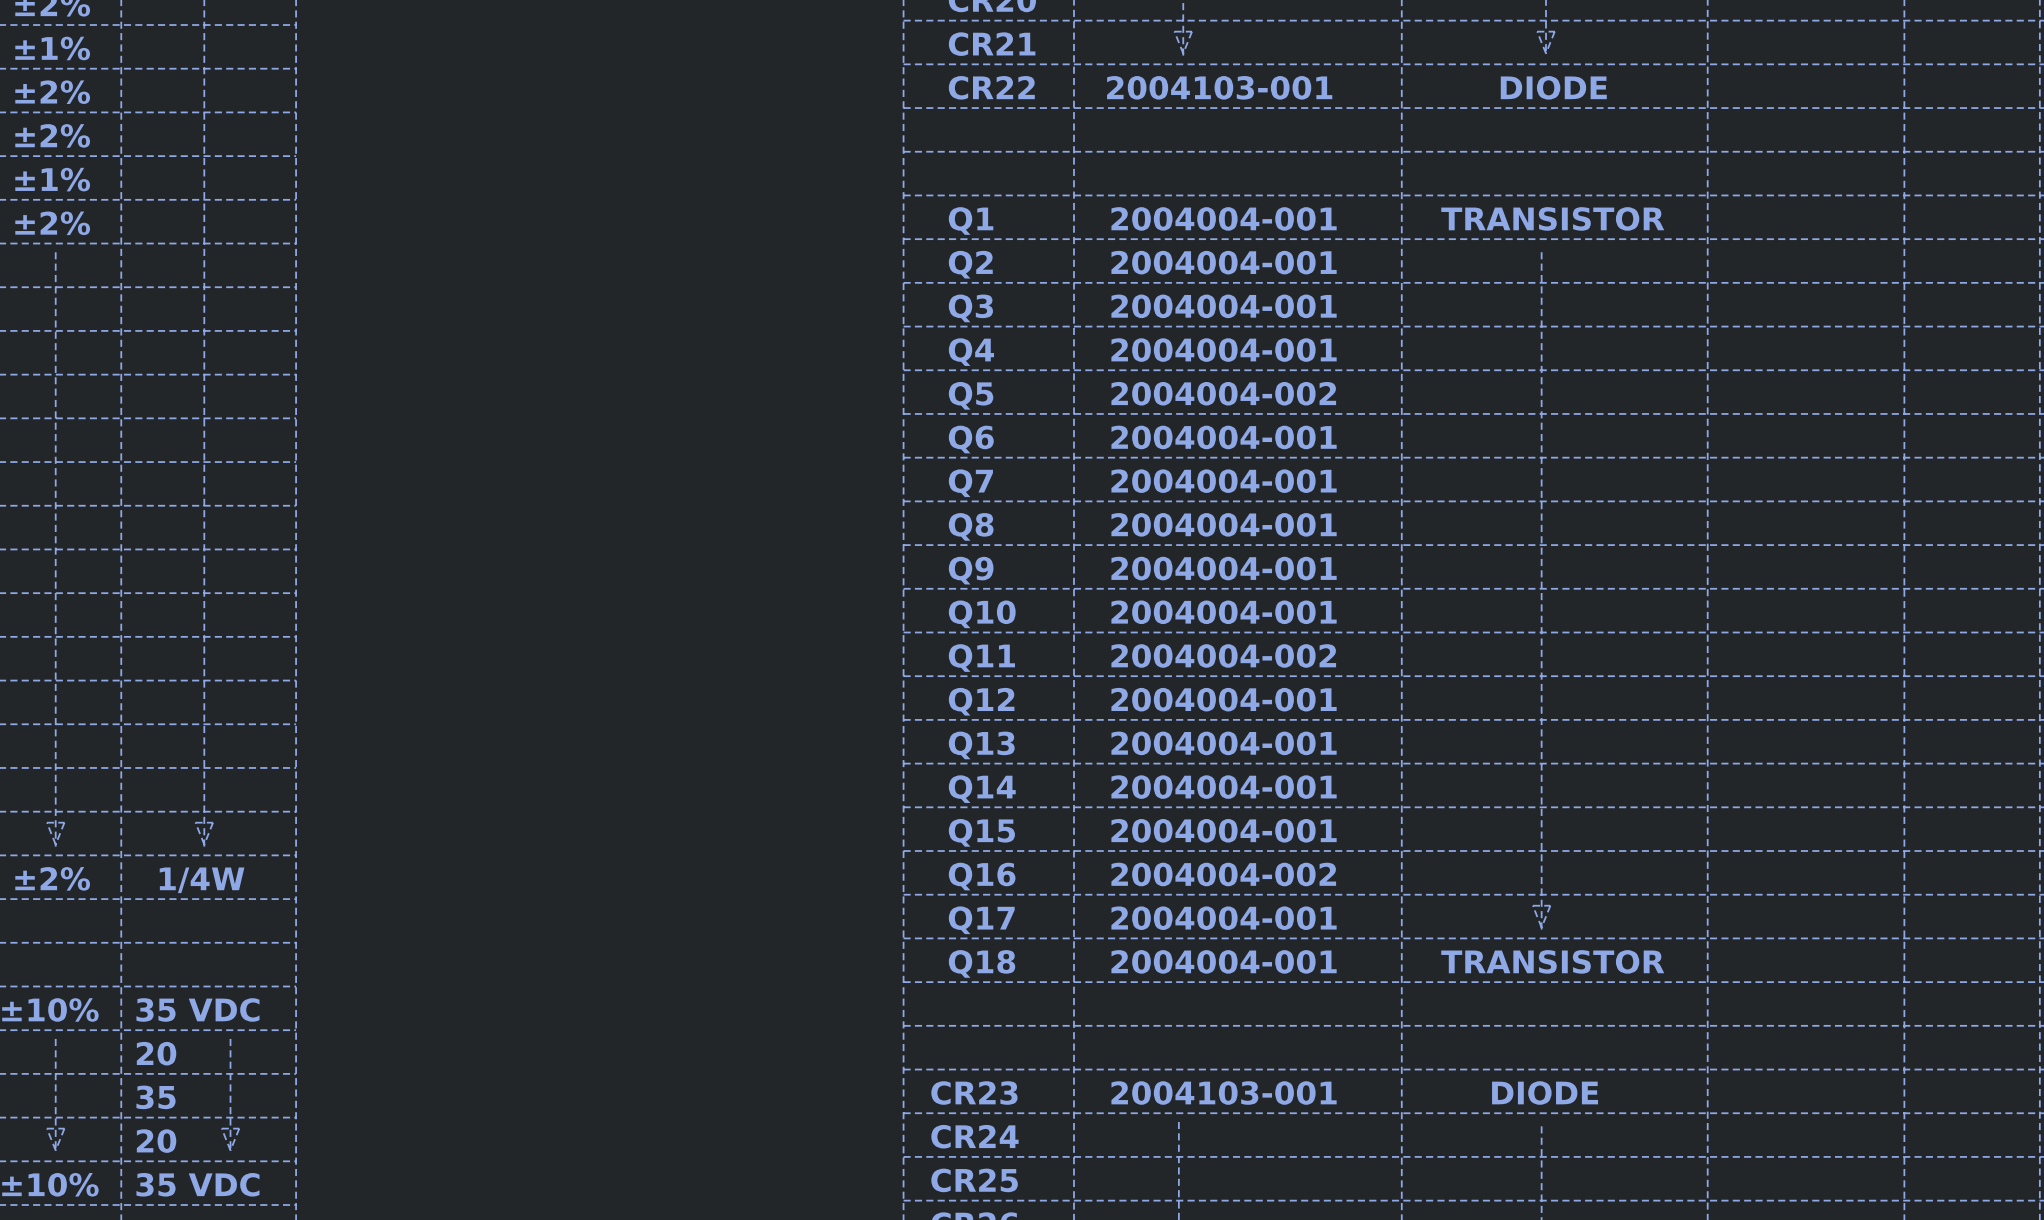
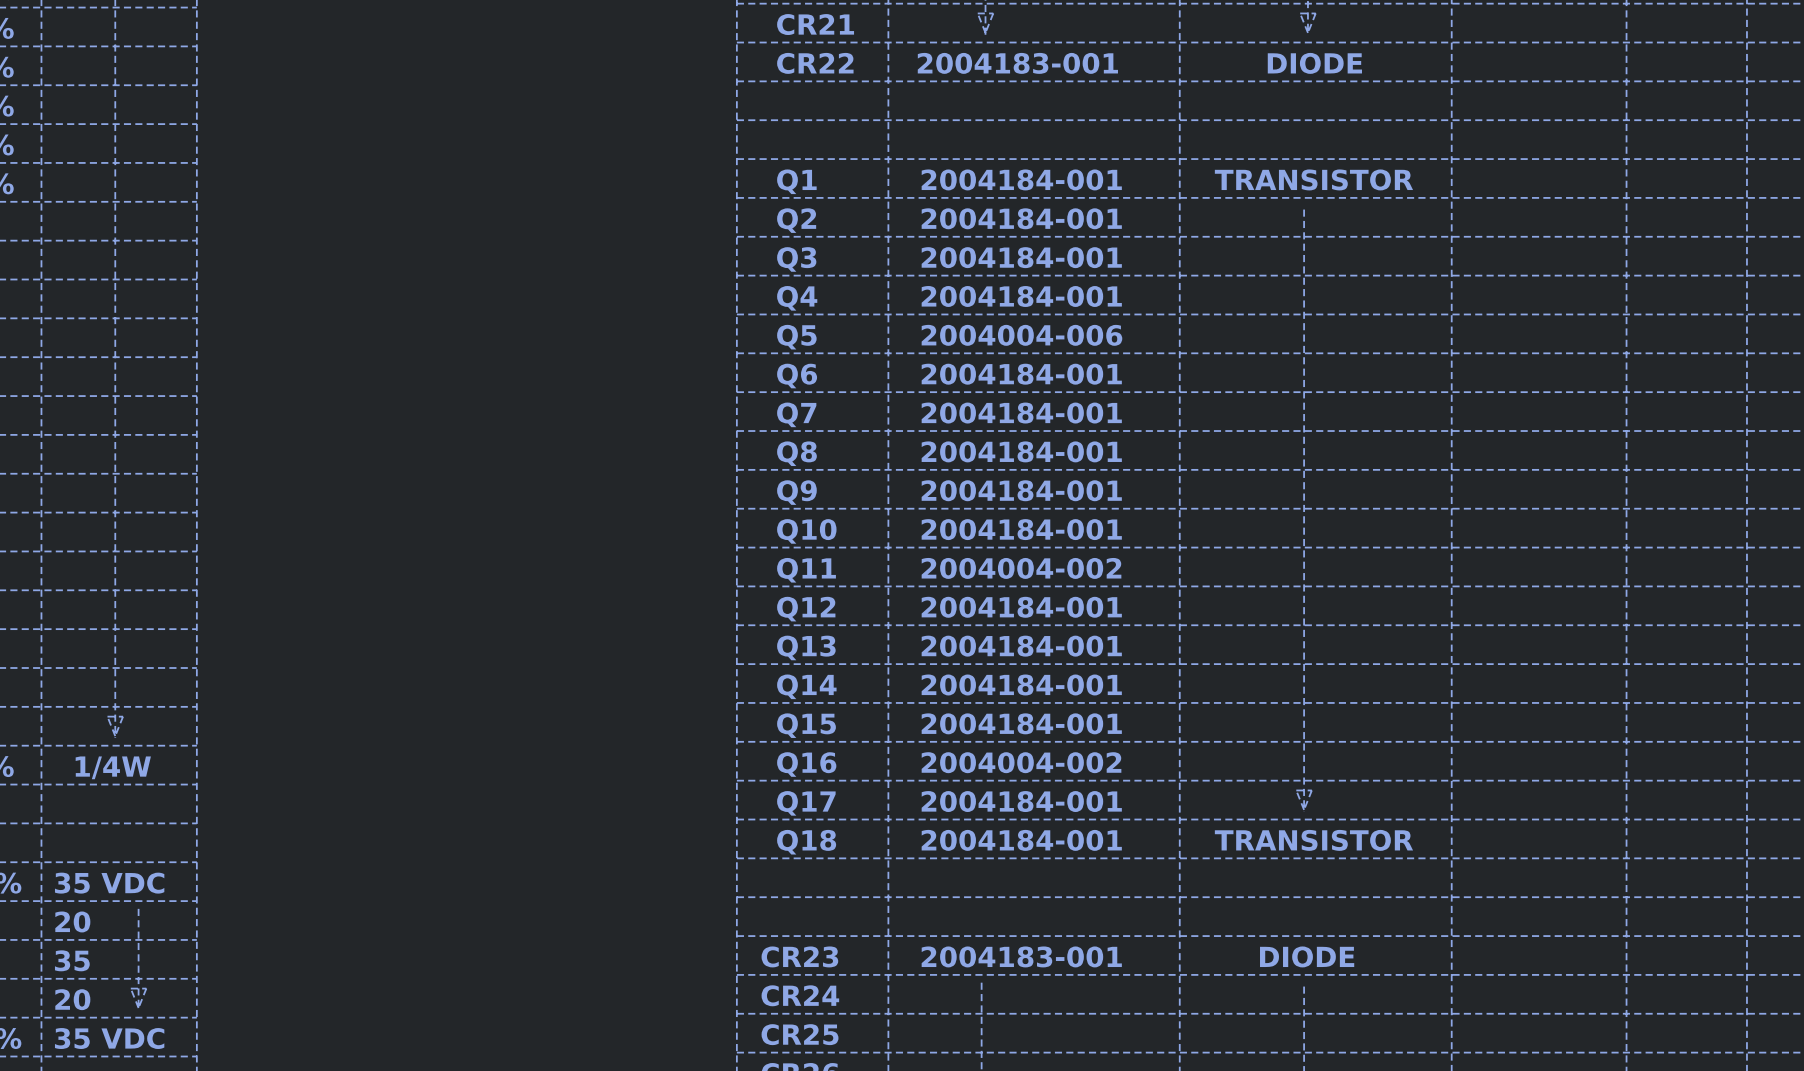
text: 2004103-001 (1219, 87) -> 2004183-001 (1017, 63)
text: 2004004-001 (1224, 218) -> 2004184-001 (1021, 179)
text: 2004004-001 (1224, 262) -> 2004184-001 (1021, 218)
text: 2004004-001 (1224, 306) -> 2004184-001 (1021, 257)
text: 2004004-001 (1224, 350) -> 2004184-001 (1021, 296)
text: 2004004-002 (1223, 393) -> 2004004-006 (1021, 335)
text: 2004004-001 (1224, 437) -> 2004184-001 (1021, 374)
text: 2004004-001 (1224, 481) -> 2004184-001 (1021, 413)
text: 2004004-001 (1224, 524) -> 2004184-001 (1021, 451)
text: 2004004-001 (1224, 568) -> 2004184-001 (1021, 490)
text: 2004004-001 (1224, 612) -> 2004184-001 (1021, 529)
text: 2004004-001 (1224, 699) -> 2004184-001 (1021, 607)
text: 2004004-001 (1224, 743) -> 2004184-001 (1021, 646)
text: 2004004-001 (1224, 787) -> 2004184-001 (1021, 684)
text: 2004004-001 (1224, 830) -> 2004184-001 (1021, 723)
text: 2004004-001 (1224, 918) -> 2004184-001 (1021, 801)
text: 2004004-001 (1224, 961) -> 2004184-001 (1021, 840)
text: 2004103-001 (1224, 1093) -> 2004183-001 (1021, 956)

